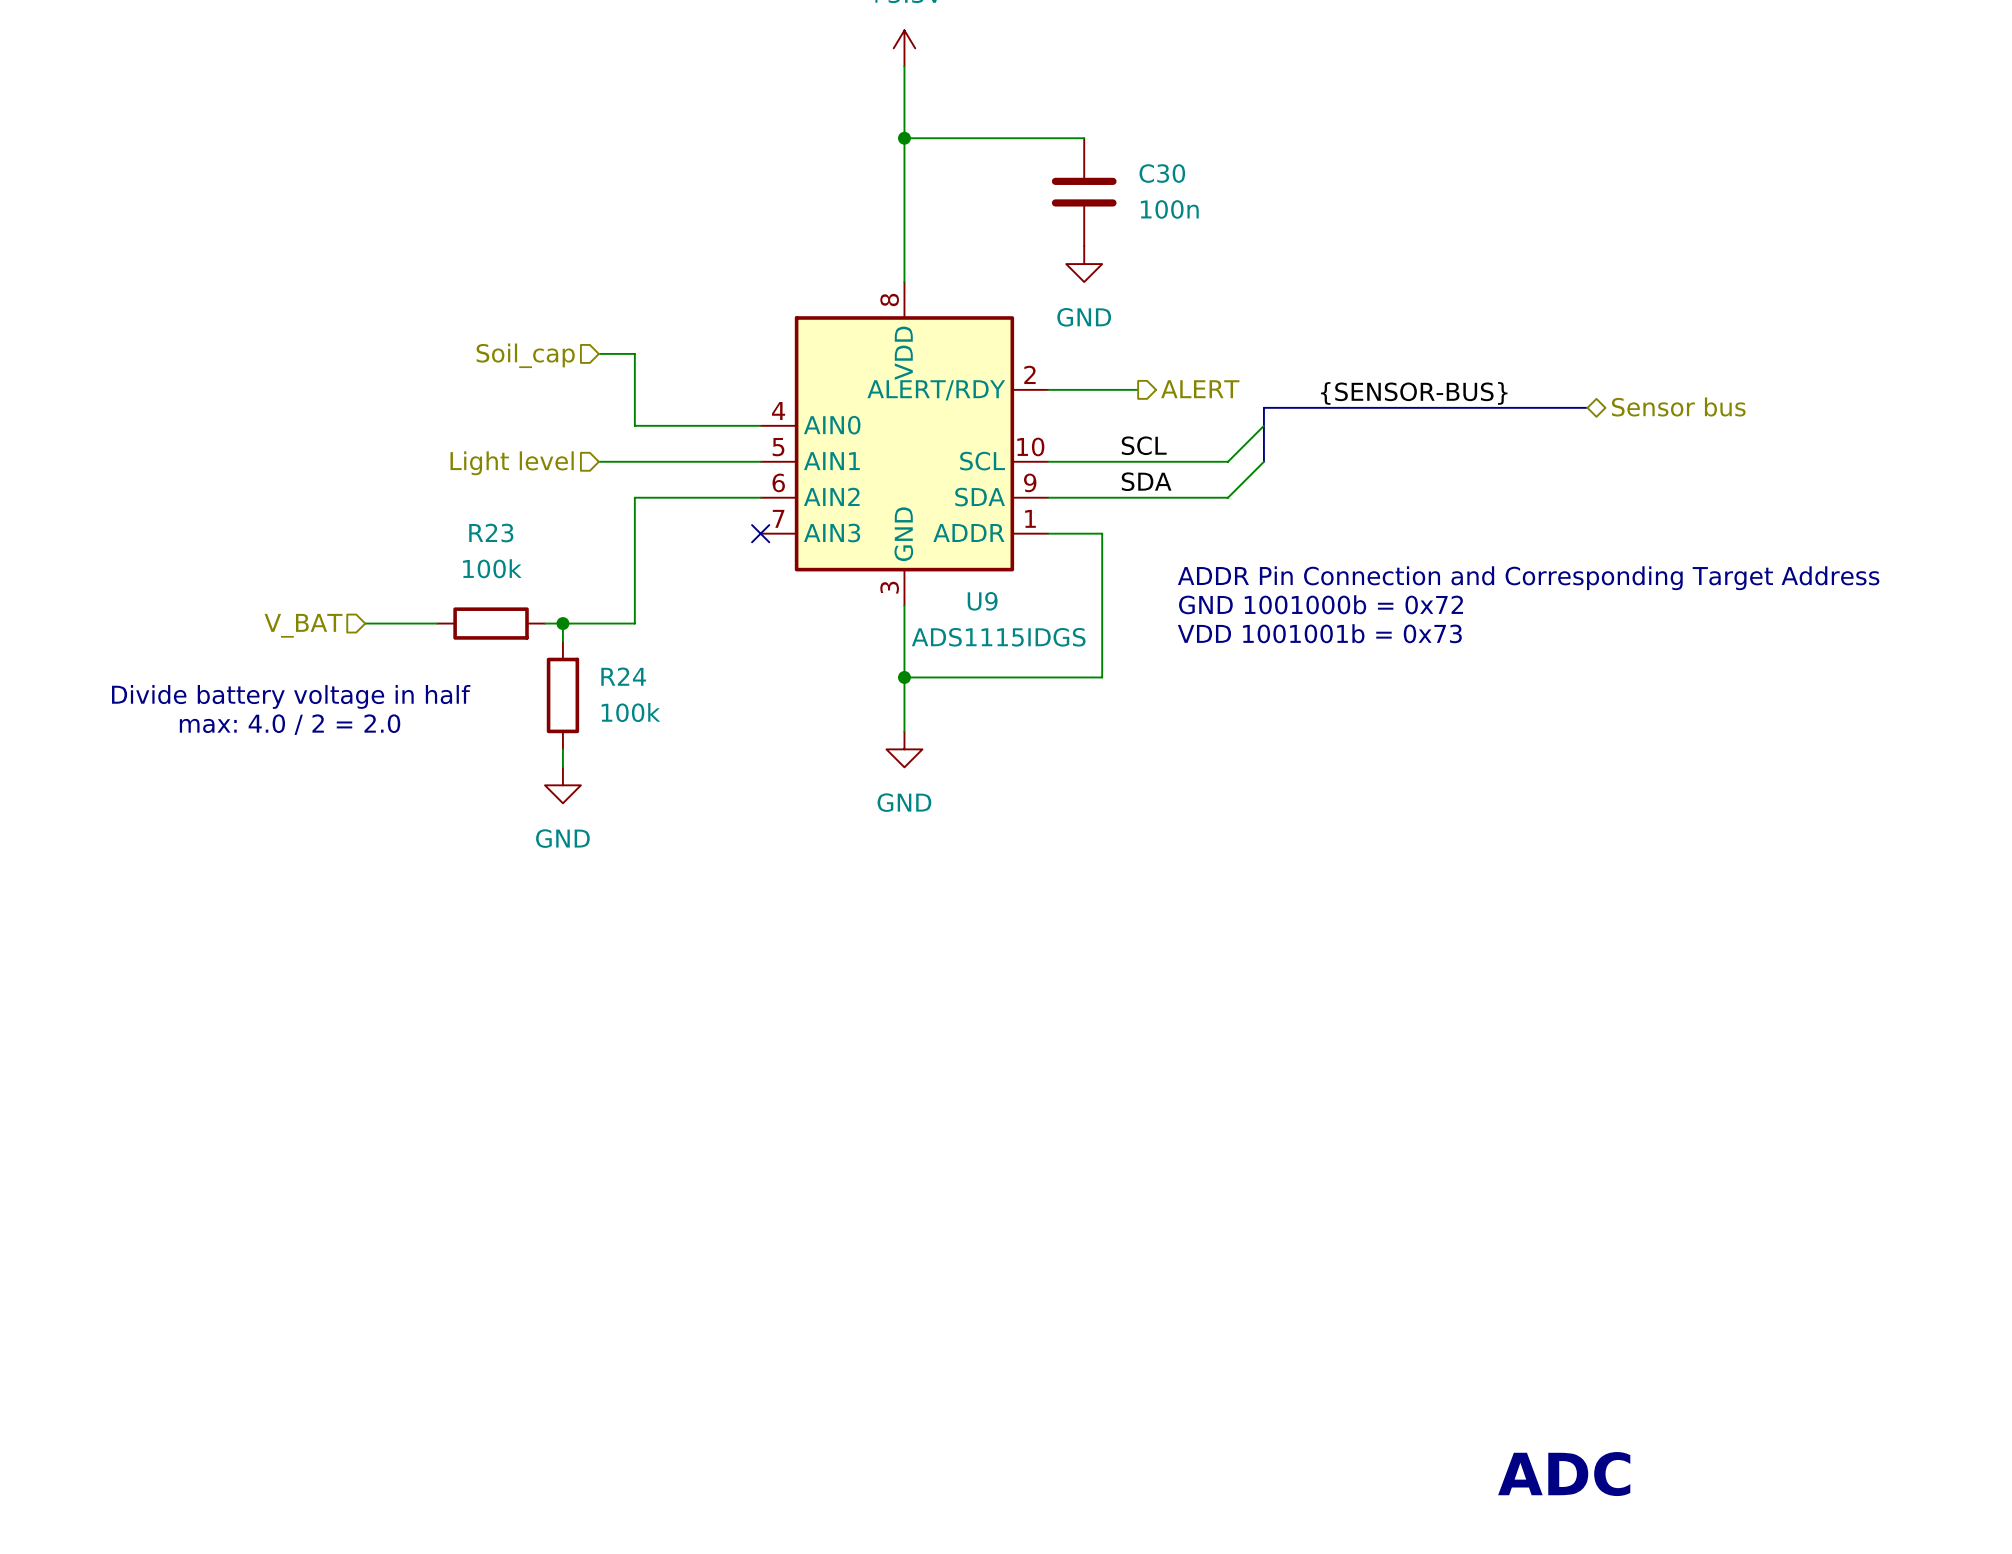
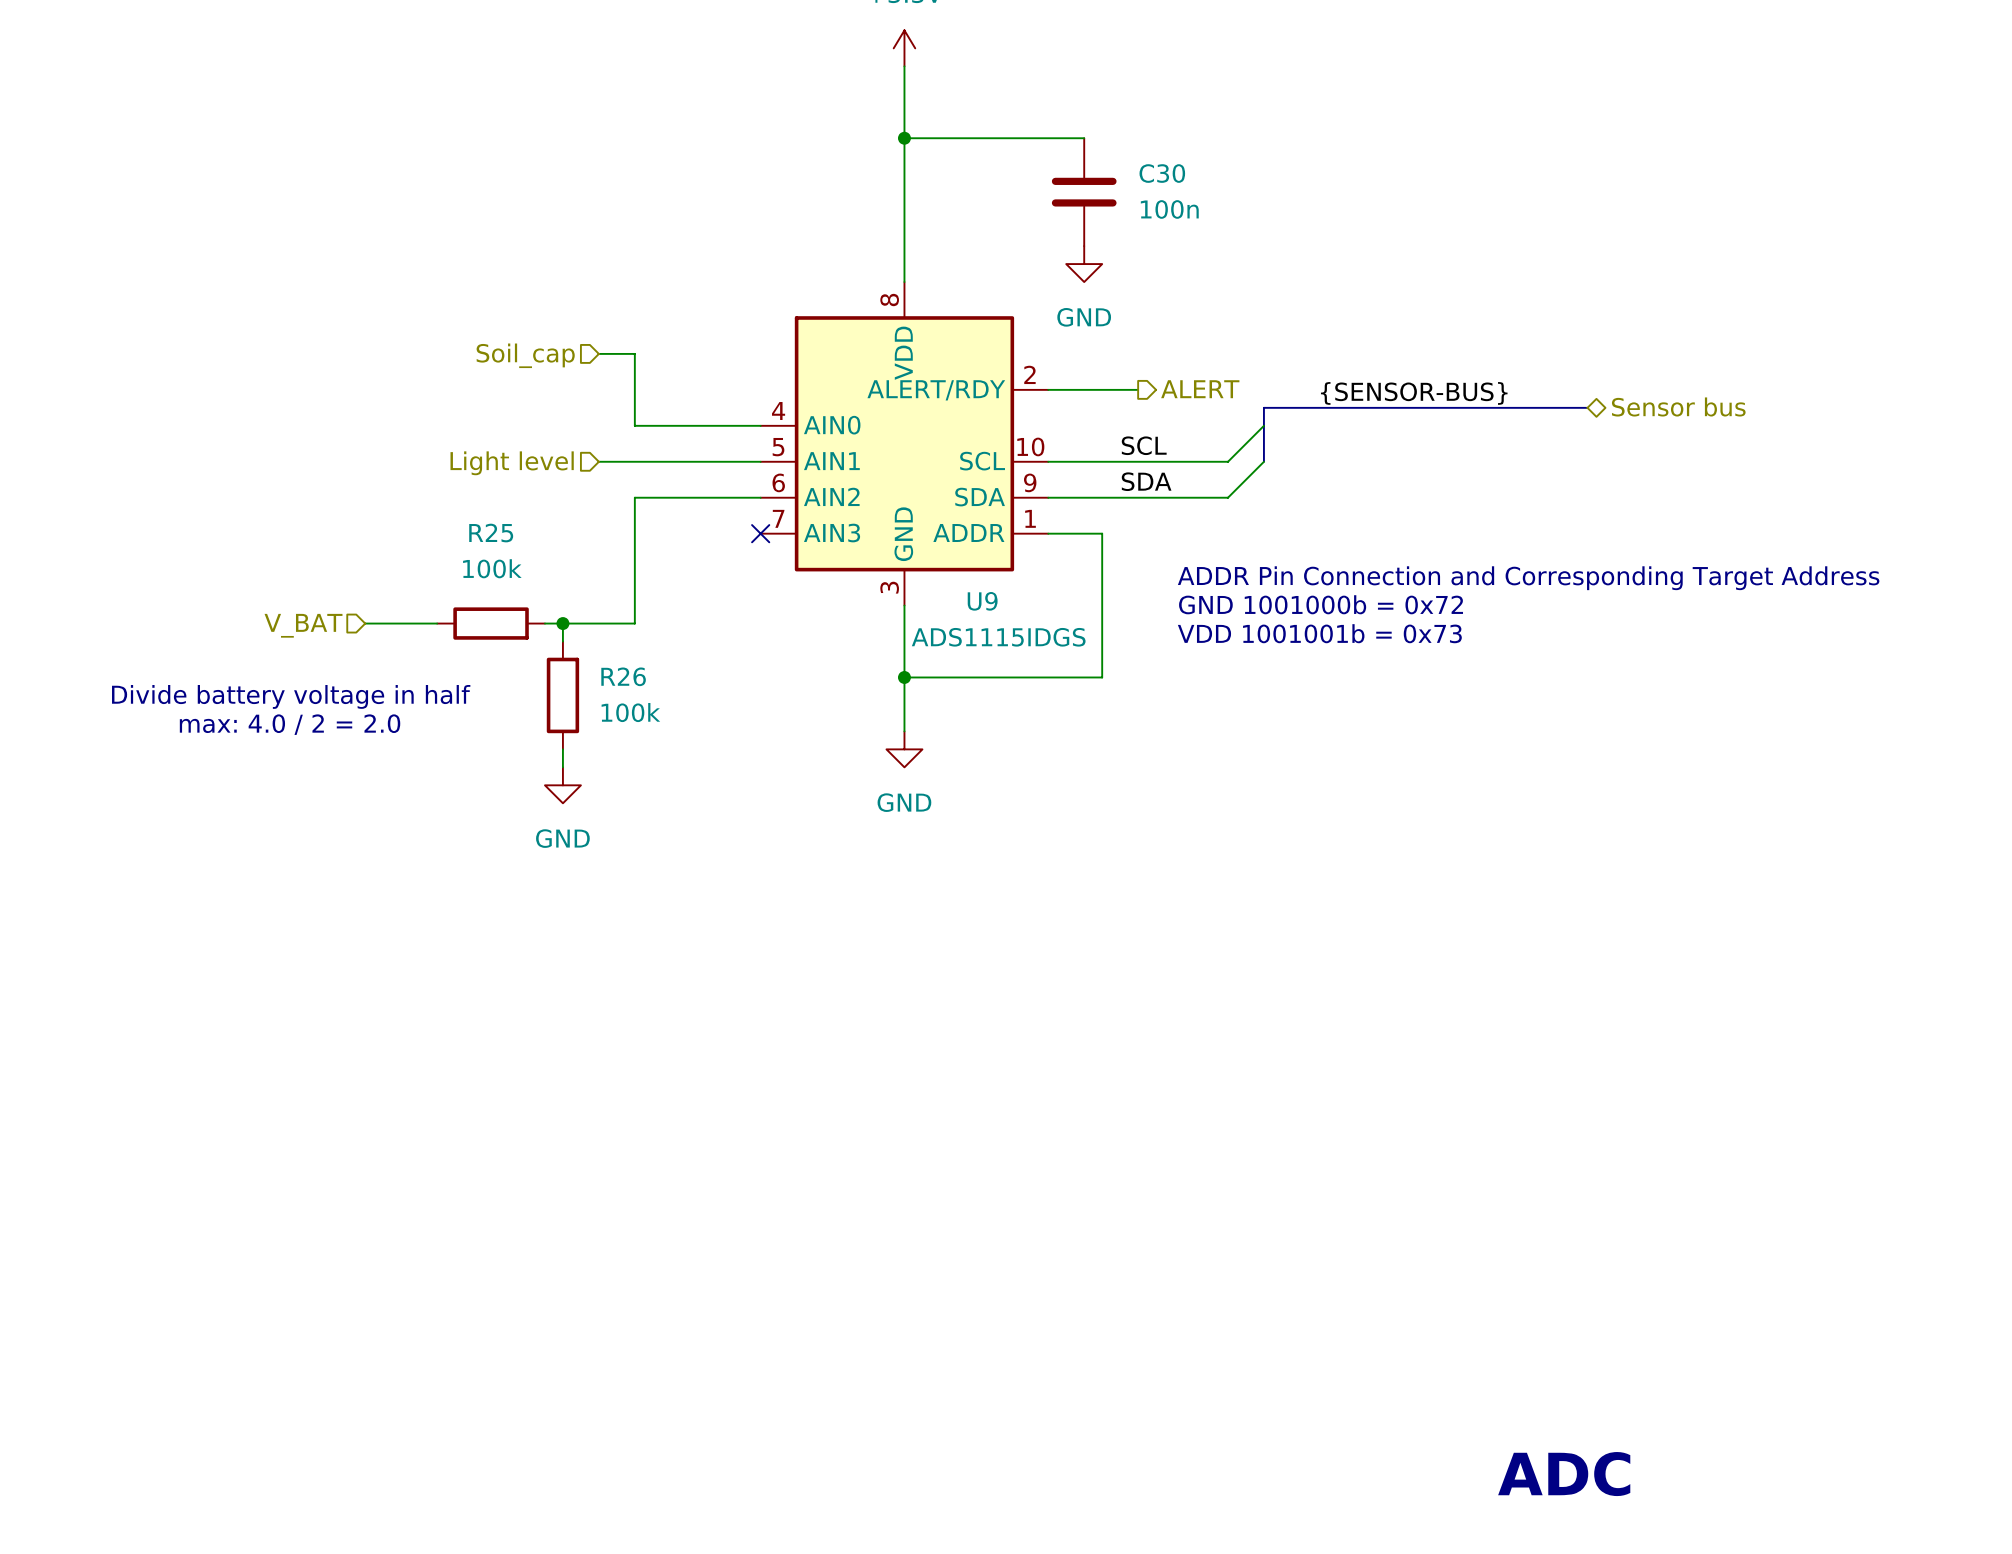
R23 name: R23 (491, 533) -> R25 (491, 533)
R24 name: R24 (623, 676) -> R26 (623, 676)

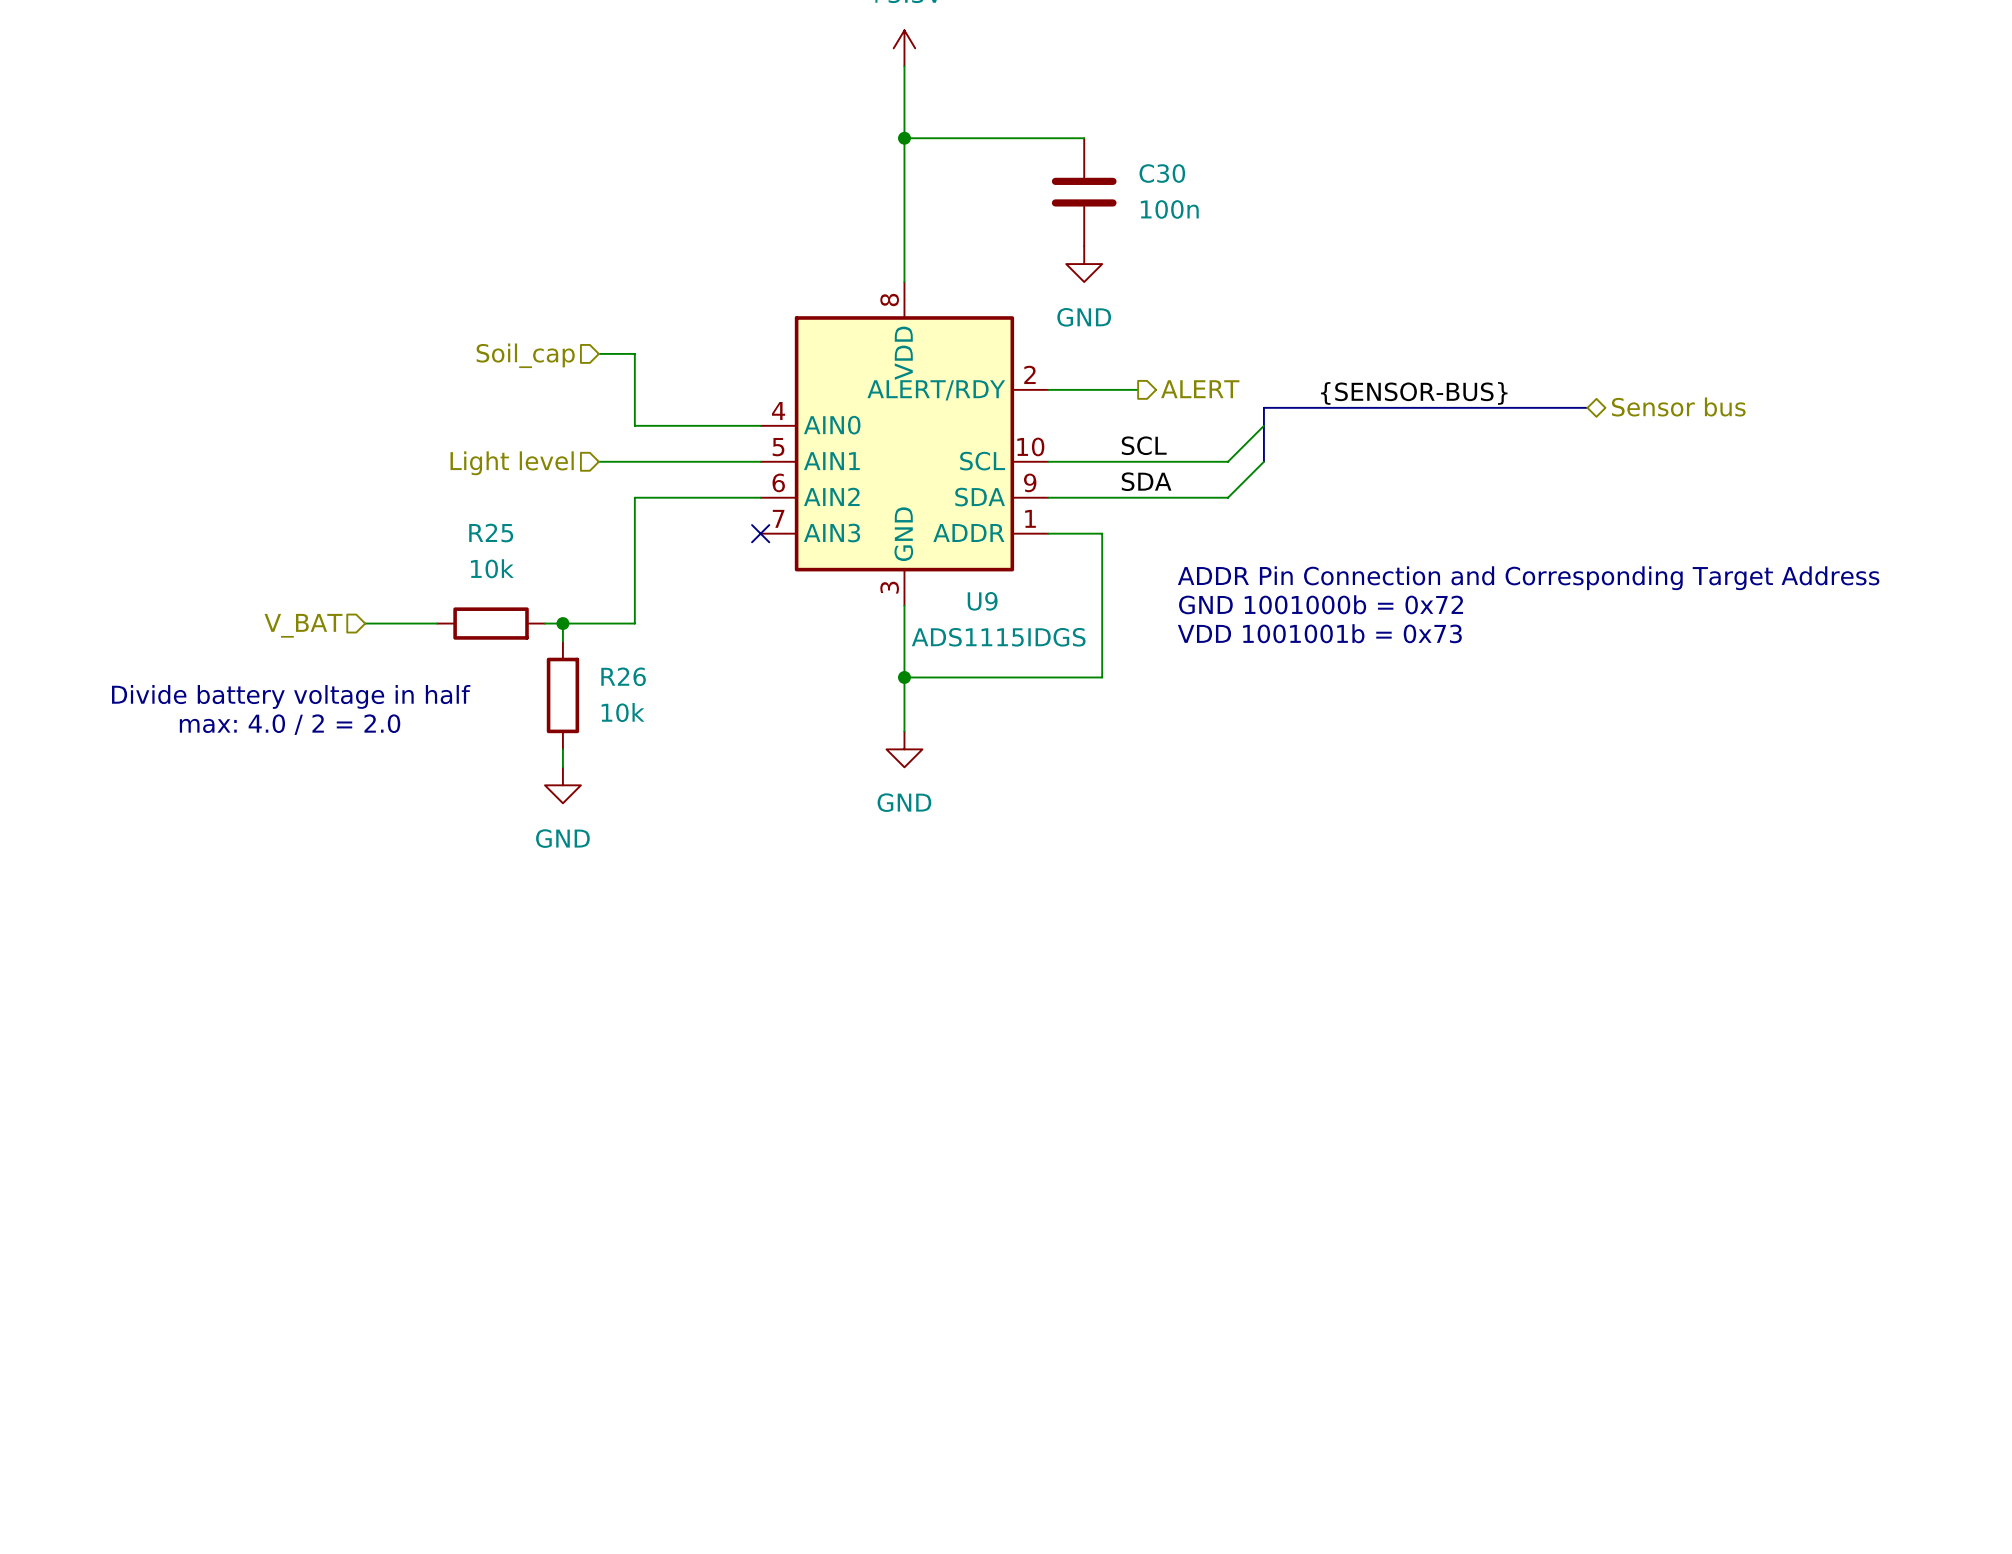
R25 value: 100k (492, 568) -> 10k (492, 568)
R26 value: 100k (630, 712) -> 10k (623, 712)
text: ADC (1564, 1474) -> none

